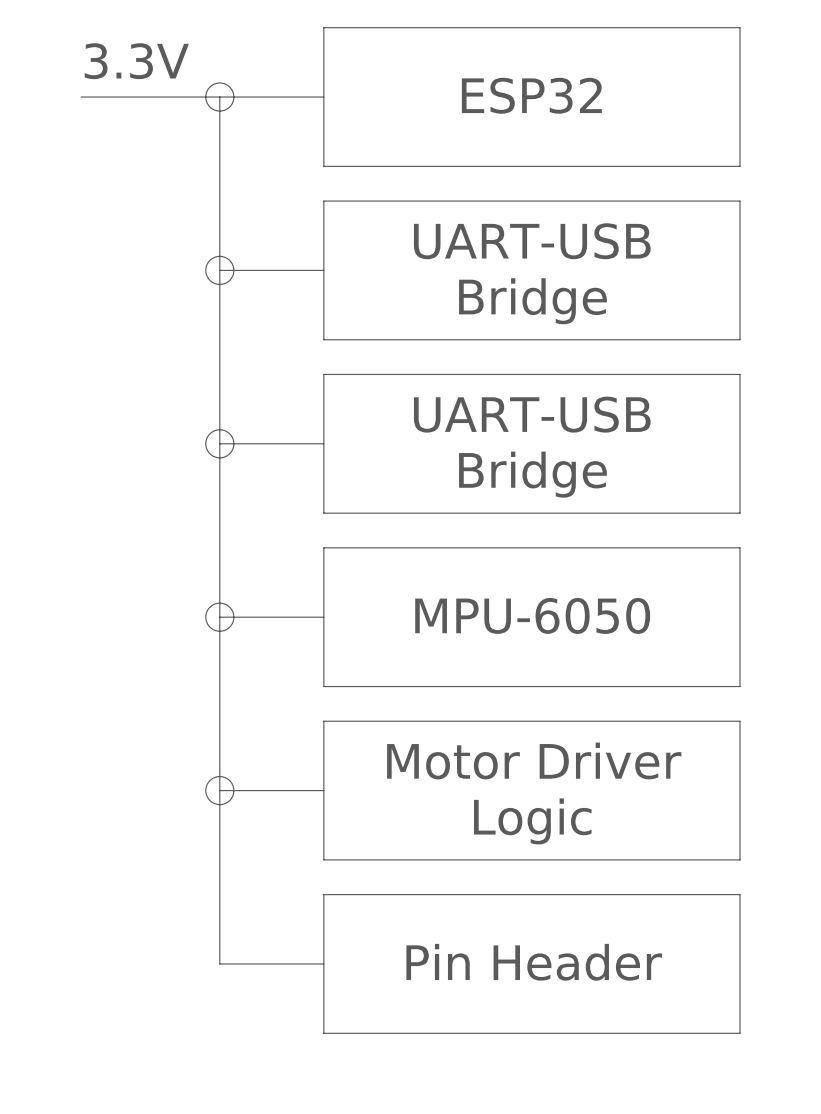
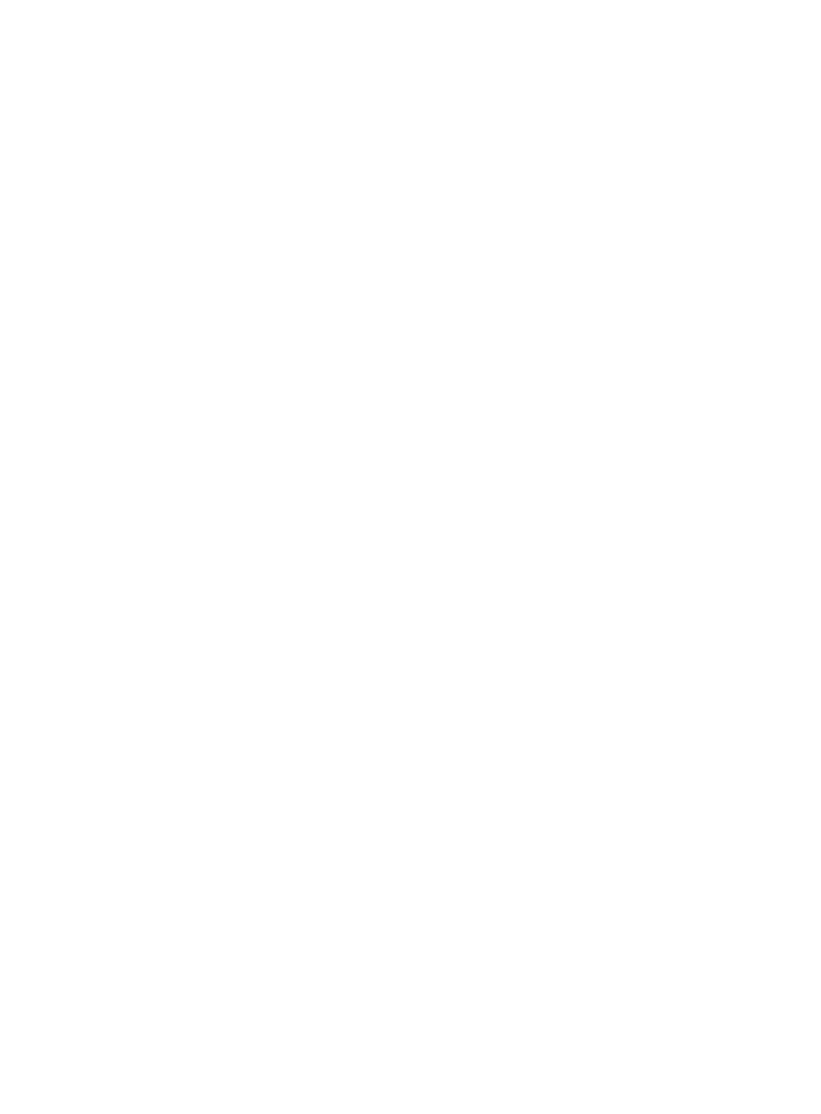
line: (323, 27) (323, 166) (739, 166) (739, 27) (323, 27) -> none
text: 3.3V (136, 61) -> none
drawing: [205, 82, 234, 112] -> none
text: ESP32 (531, 95) -> none
line: (81, 97) (323, 97) -> none
line: (219, 97) (219, 963) (323, 963) -> none
line: (323, 201) (323, 339) (739, 339) (739, 201) (323, 201) -> none
text: UART-USB (532, 241) -> none
drawing: [205, 256, 234, 285] -> none
line: (219, 270) (323, 270) -> none
text: Bridge (532, 301) -> none
line: (323, 374) (323, 513) (739, 513) (739, 374) (323, 374) -> none
text: UART-USB (532, 414) -> none
drawing: [205, 429, 234, 458] -> none
line: (219, 443) (323, 443) -> none
text: Bridge (532, 474) -> none
line: (323, 547) (739, 547) (739, 686) (323, 686) (323, 547) -> none
drawing: [205, 603, 234, 632] -> none
text: MPU-6050 (532, 615) -> none
line: (219, 617) (323, 617) -> none
line: (323, 721) (323, 859) (739, 859) (739, 721) (323, 721) -> none
text: Motor Driver (534, 760) -> none
drawing: [205, 776, 234, 805] -> none
line: (219, 790) (323, 790) -> none
text: Logic (532, 821) -> none
line: (323, 894) (323, 1033) (739, 1033) (739, 894) (323, 894) -> none
text: Pin Header (534, 962) -> none

